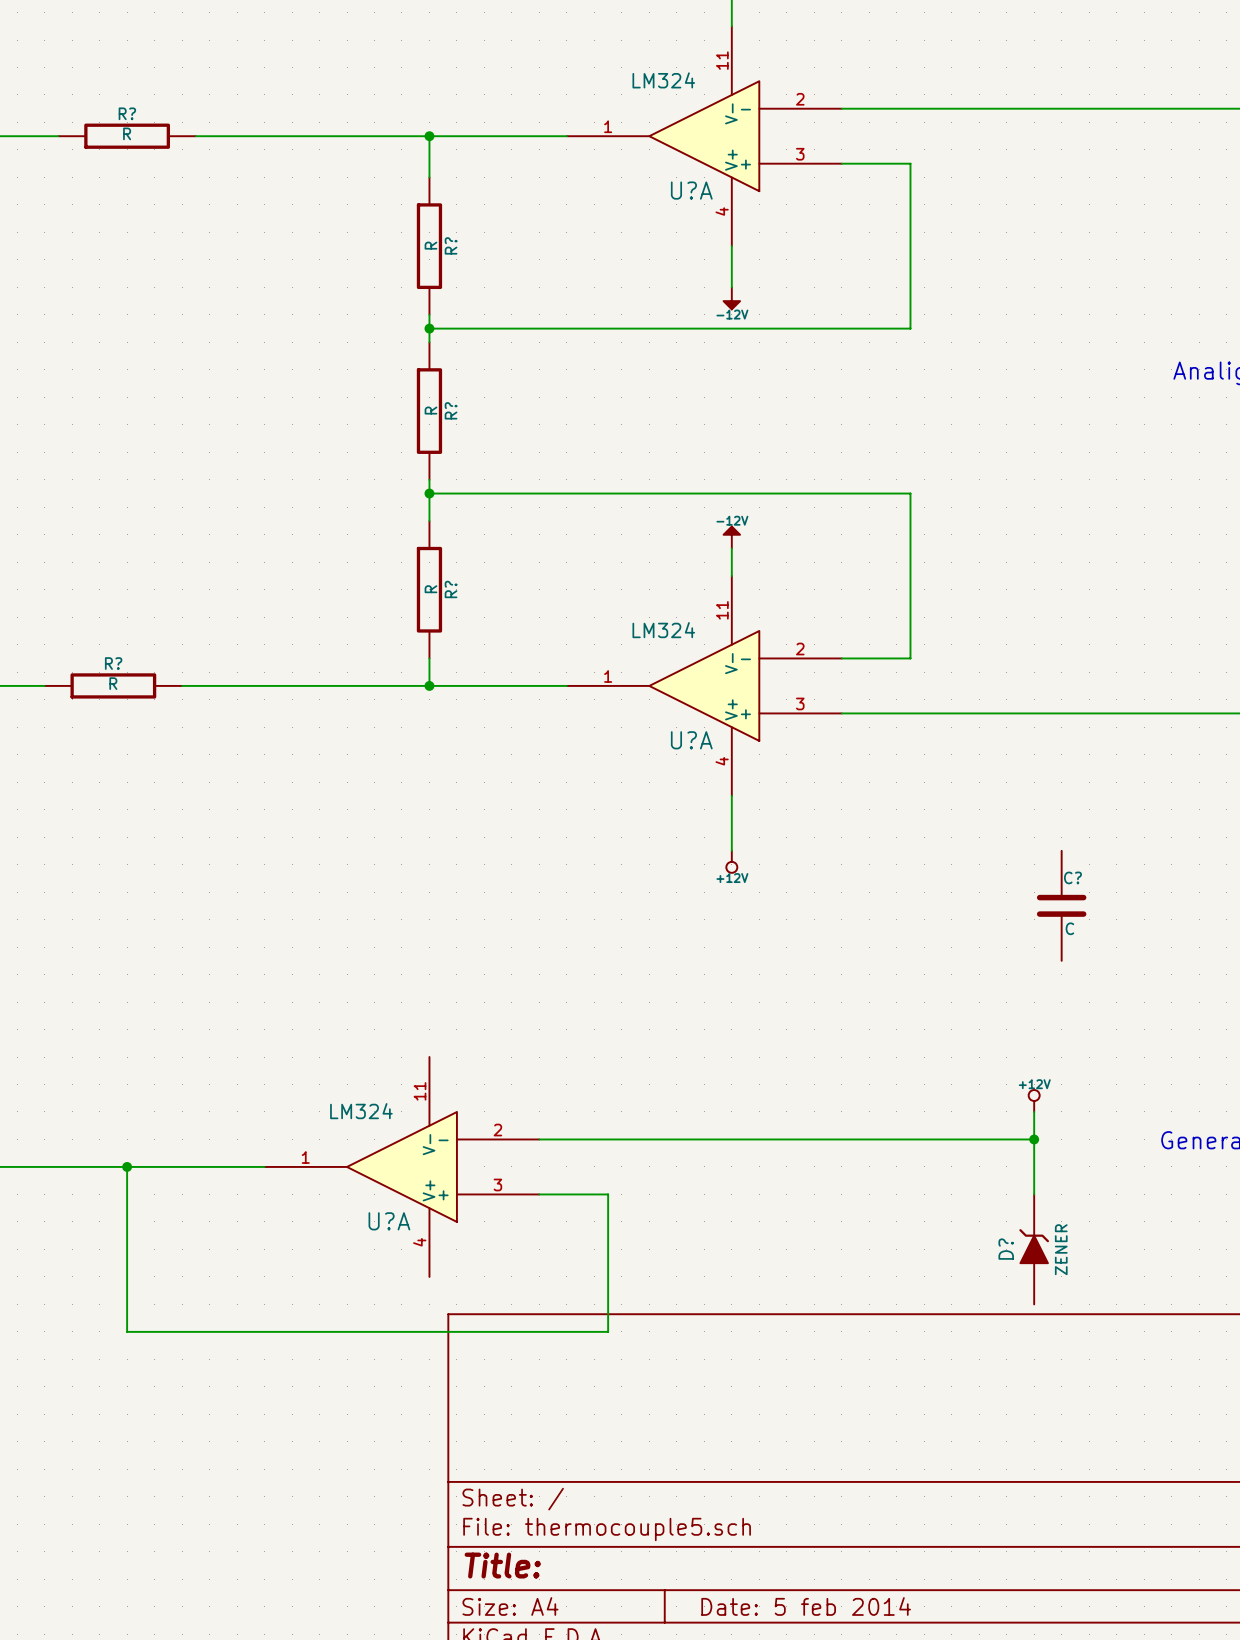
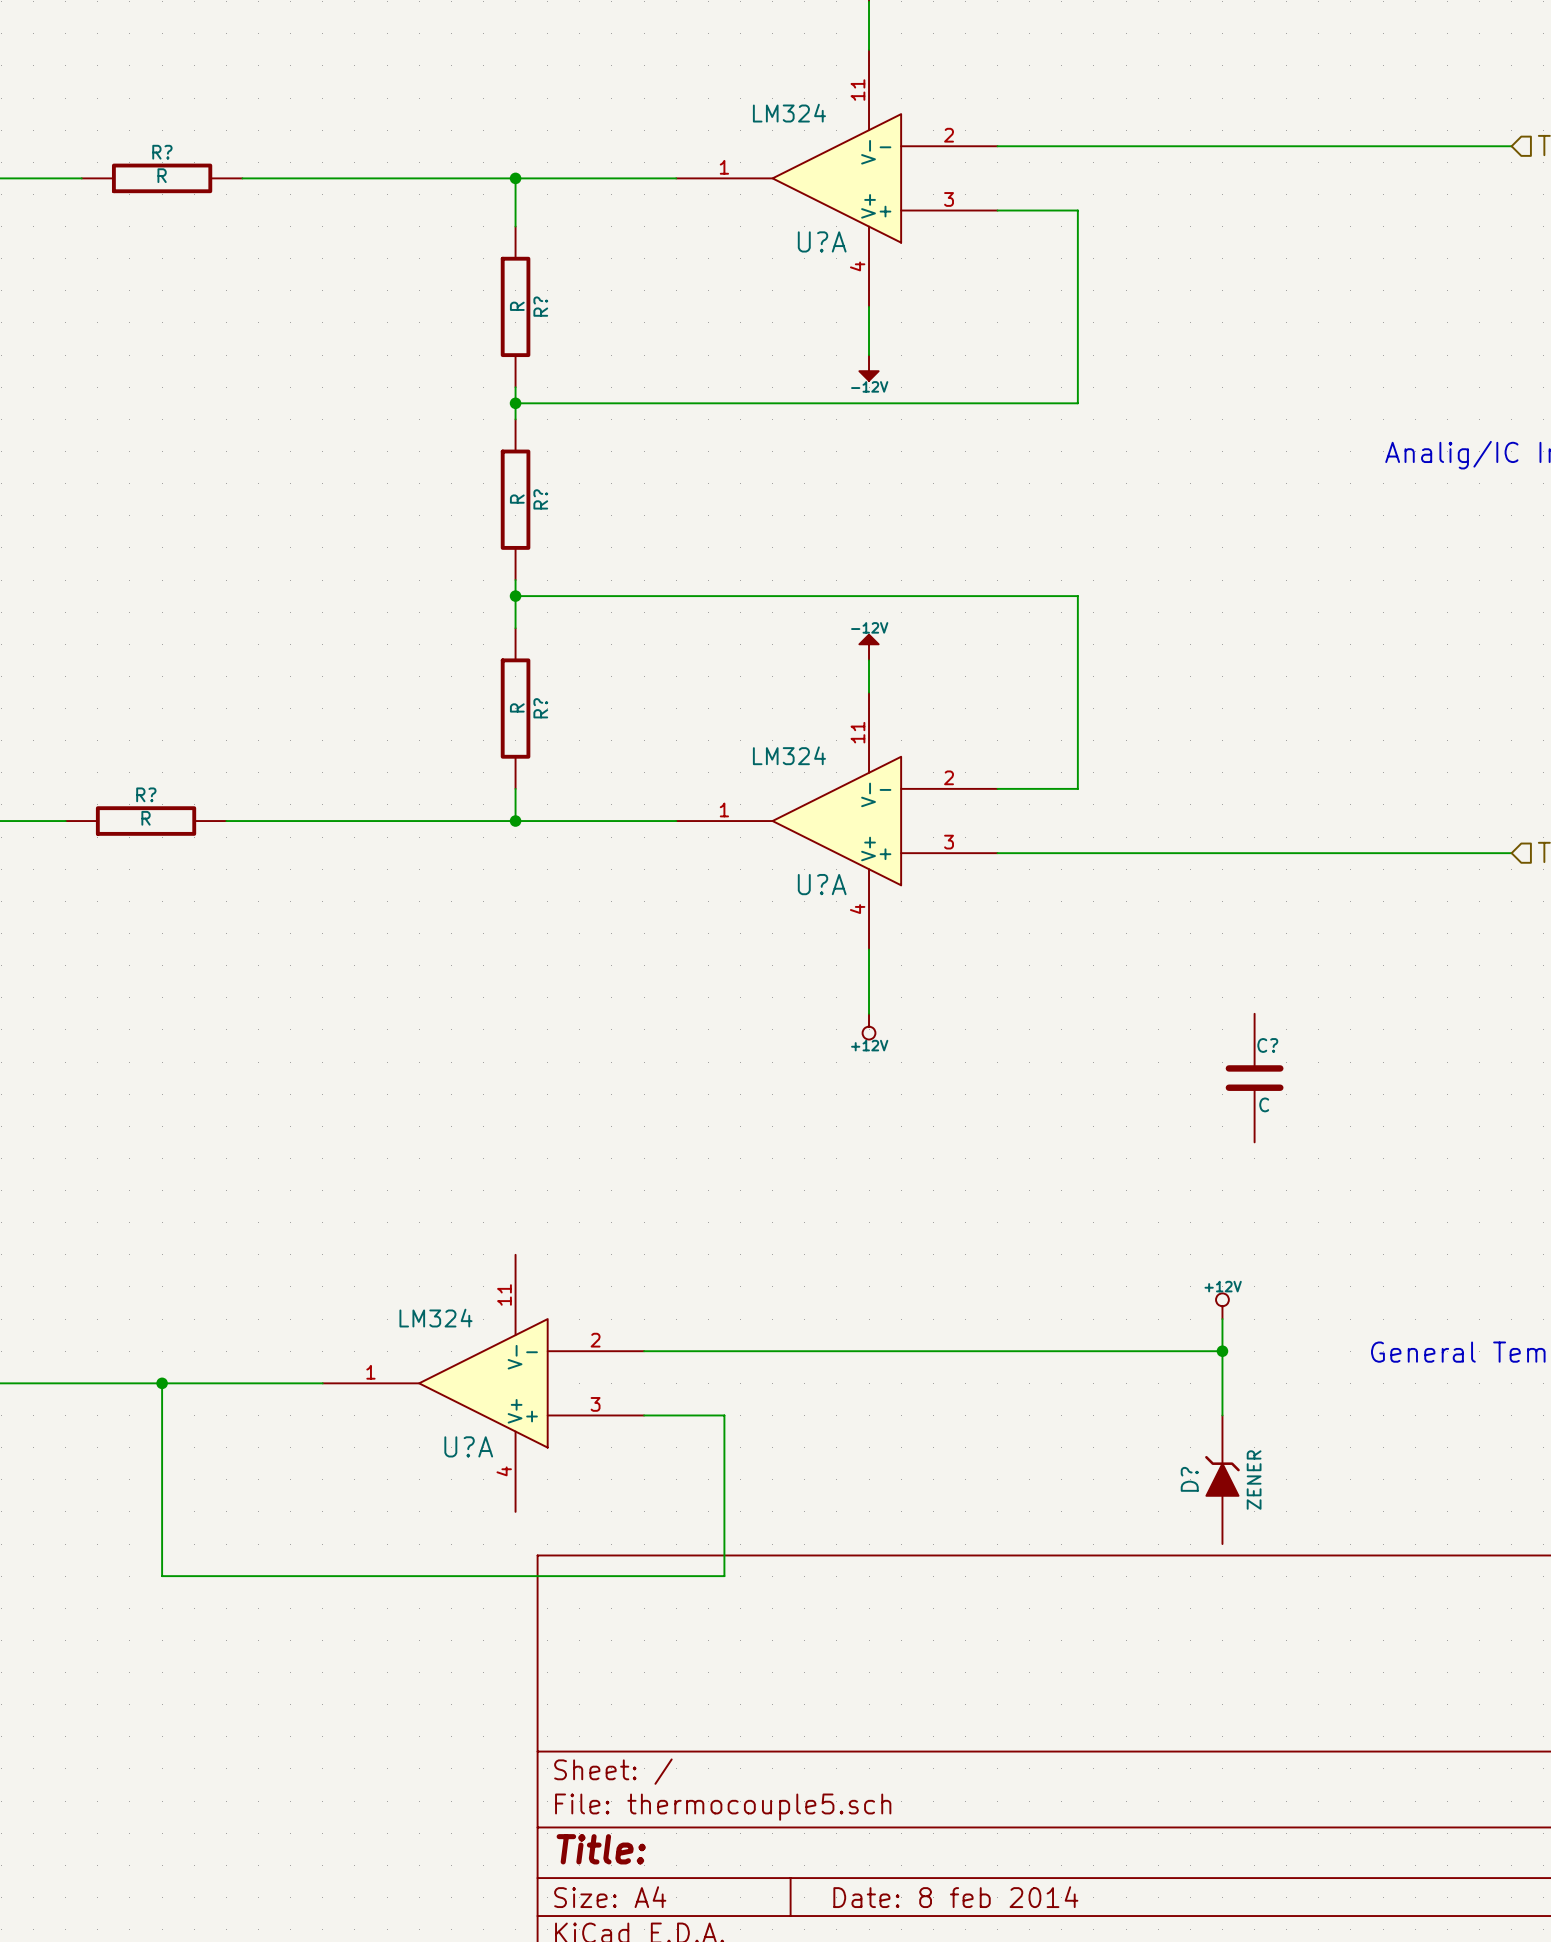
title block: Date: 5 feb 2014 (806, 1606) -> Date: 8 feb 2014 (955, 1897)

